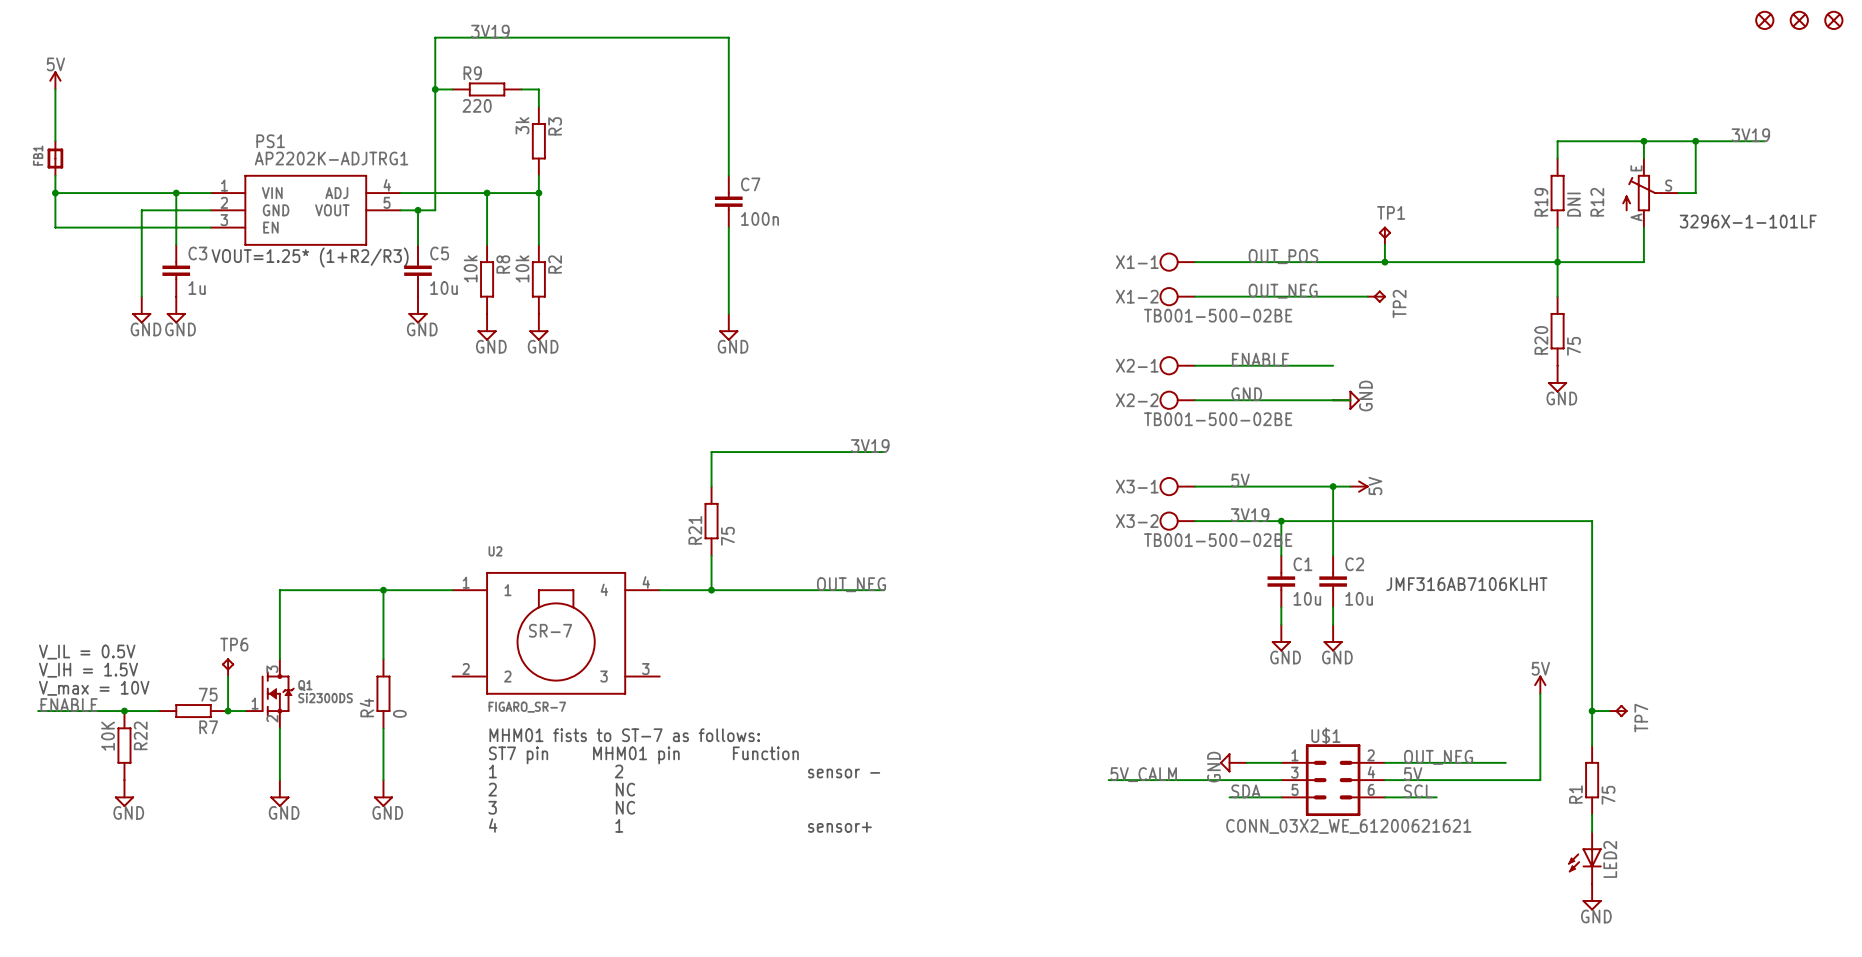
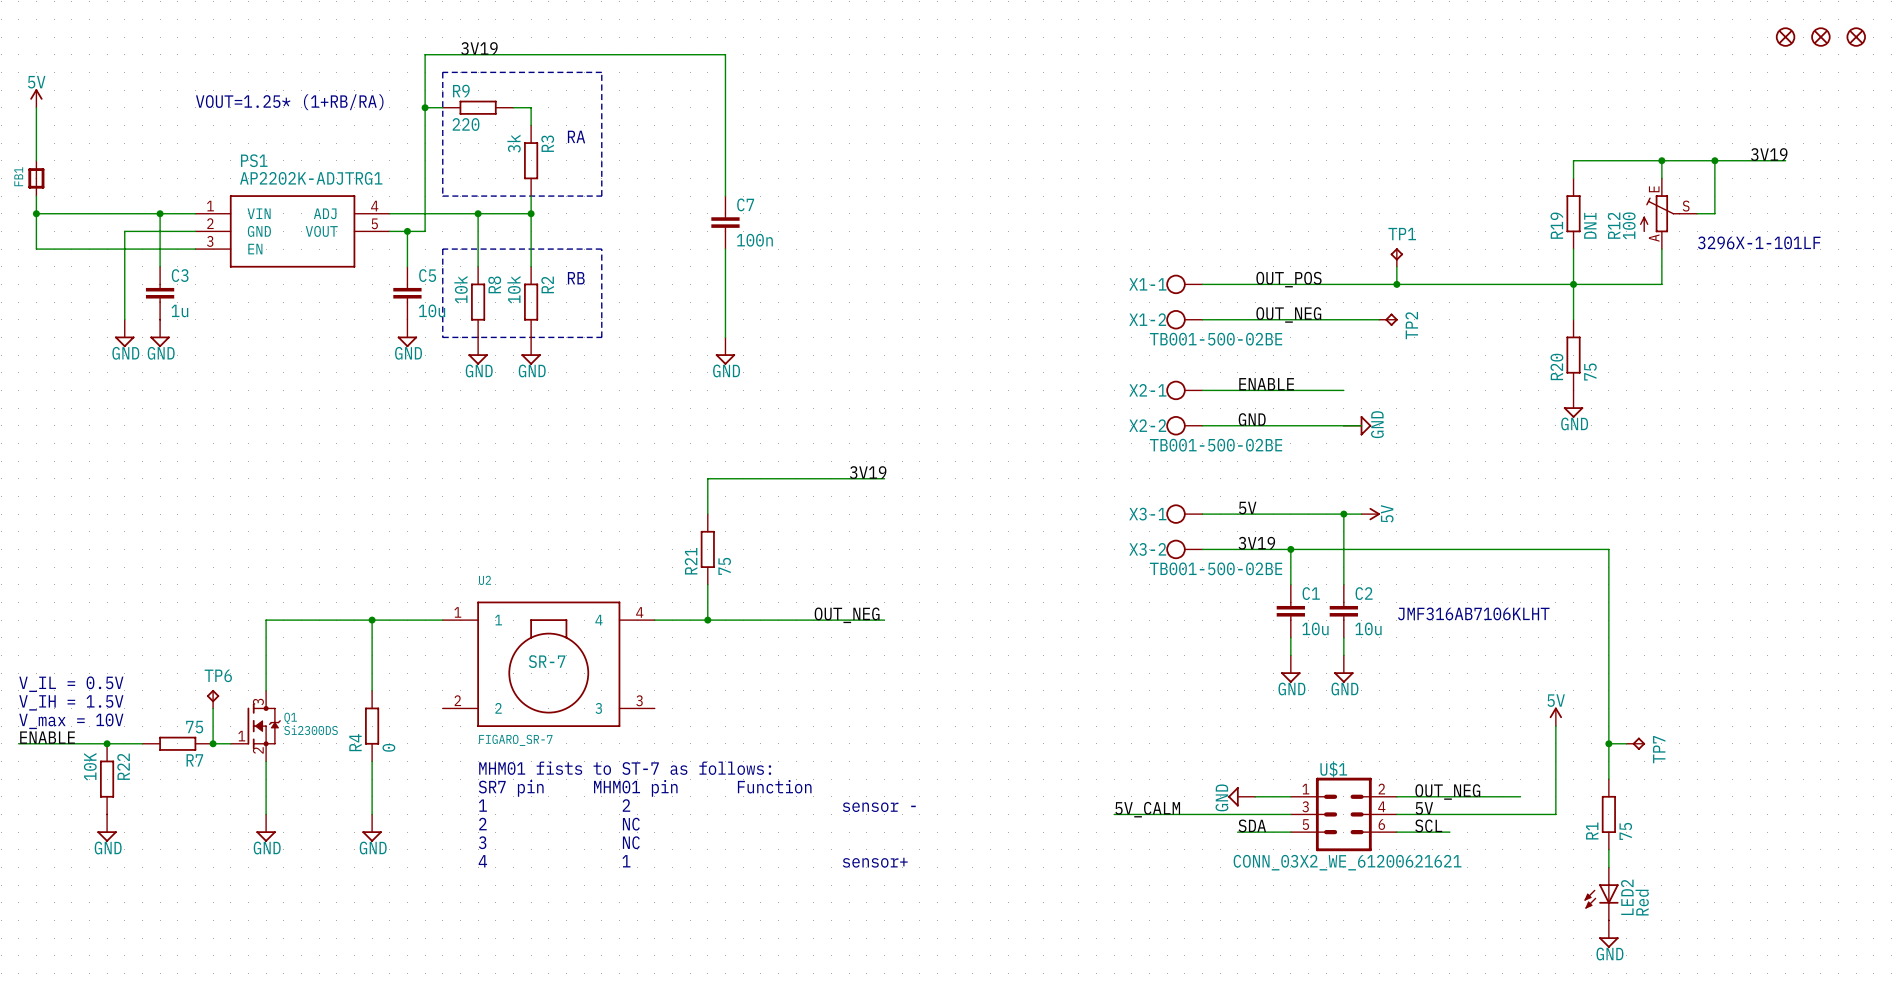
line: none -> (442, 72) (442, 196) (601, 196) (601, 72) (442, 72)
text: none -> VOUT=1.25* (1+RB/RA) (289, 102)
text: none -> RA (576, 136)
R12 value: none -> 100 (1629, 225)
line: none -> (442, 249) (442, 337) (601, 337) (601, 249) (442, 249)
text: none -> RB (576, 278)
text: VOUT=1.25* (1+R2/R3) (310, 257) -> none
text: ST7 pin MHM01 pin Function (643, 755) -> SR7 pin MHM01 pin Function (645, 788)
LED2 value: none -> Red (1642, 902)

